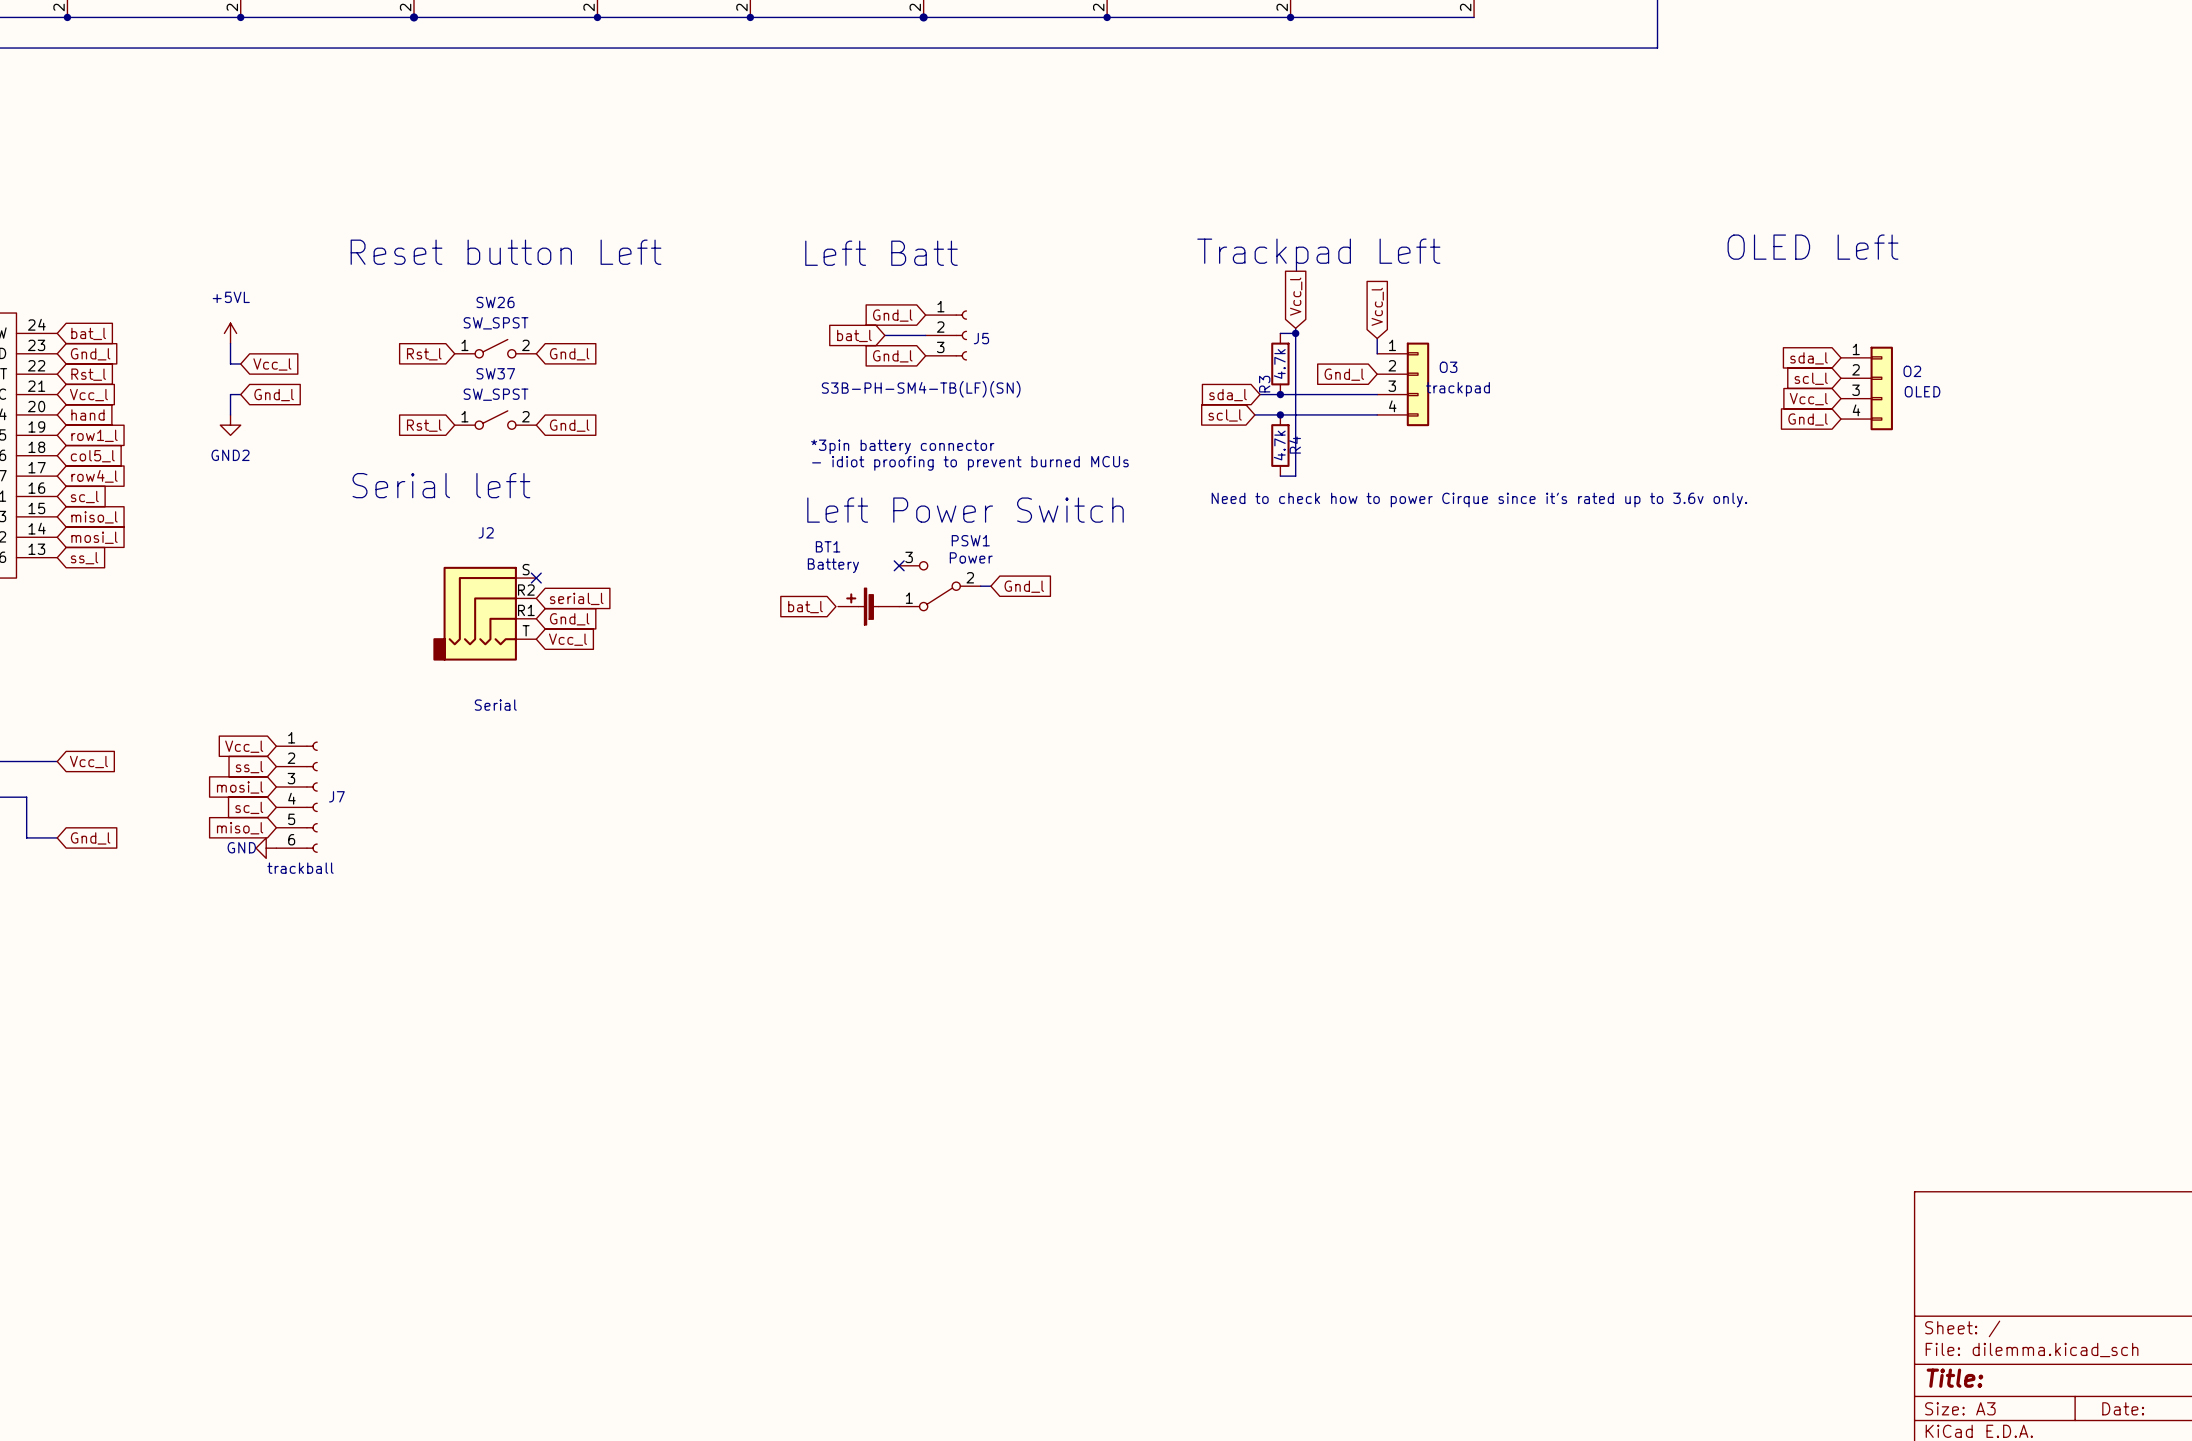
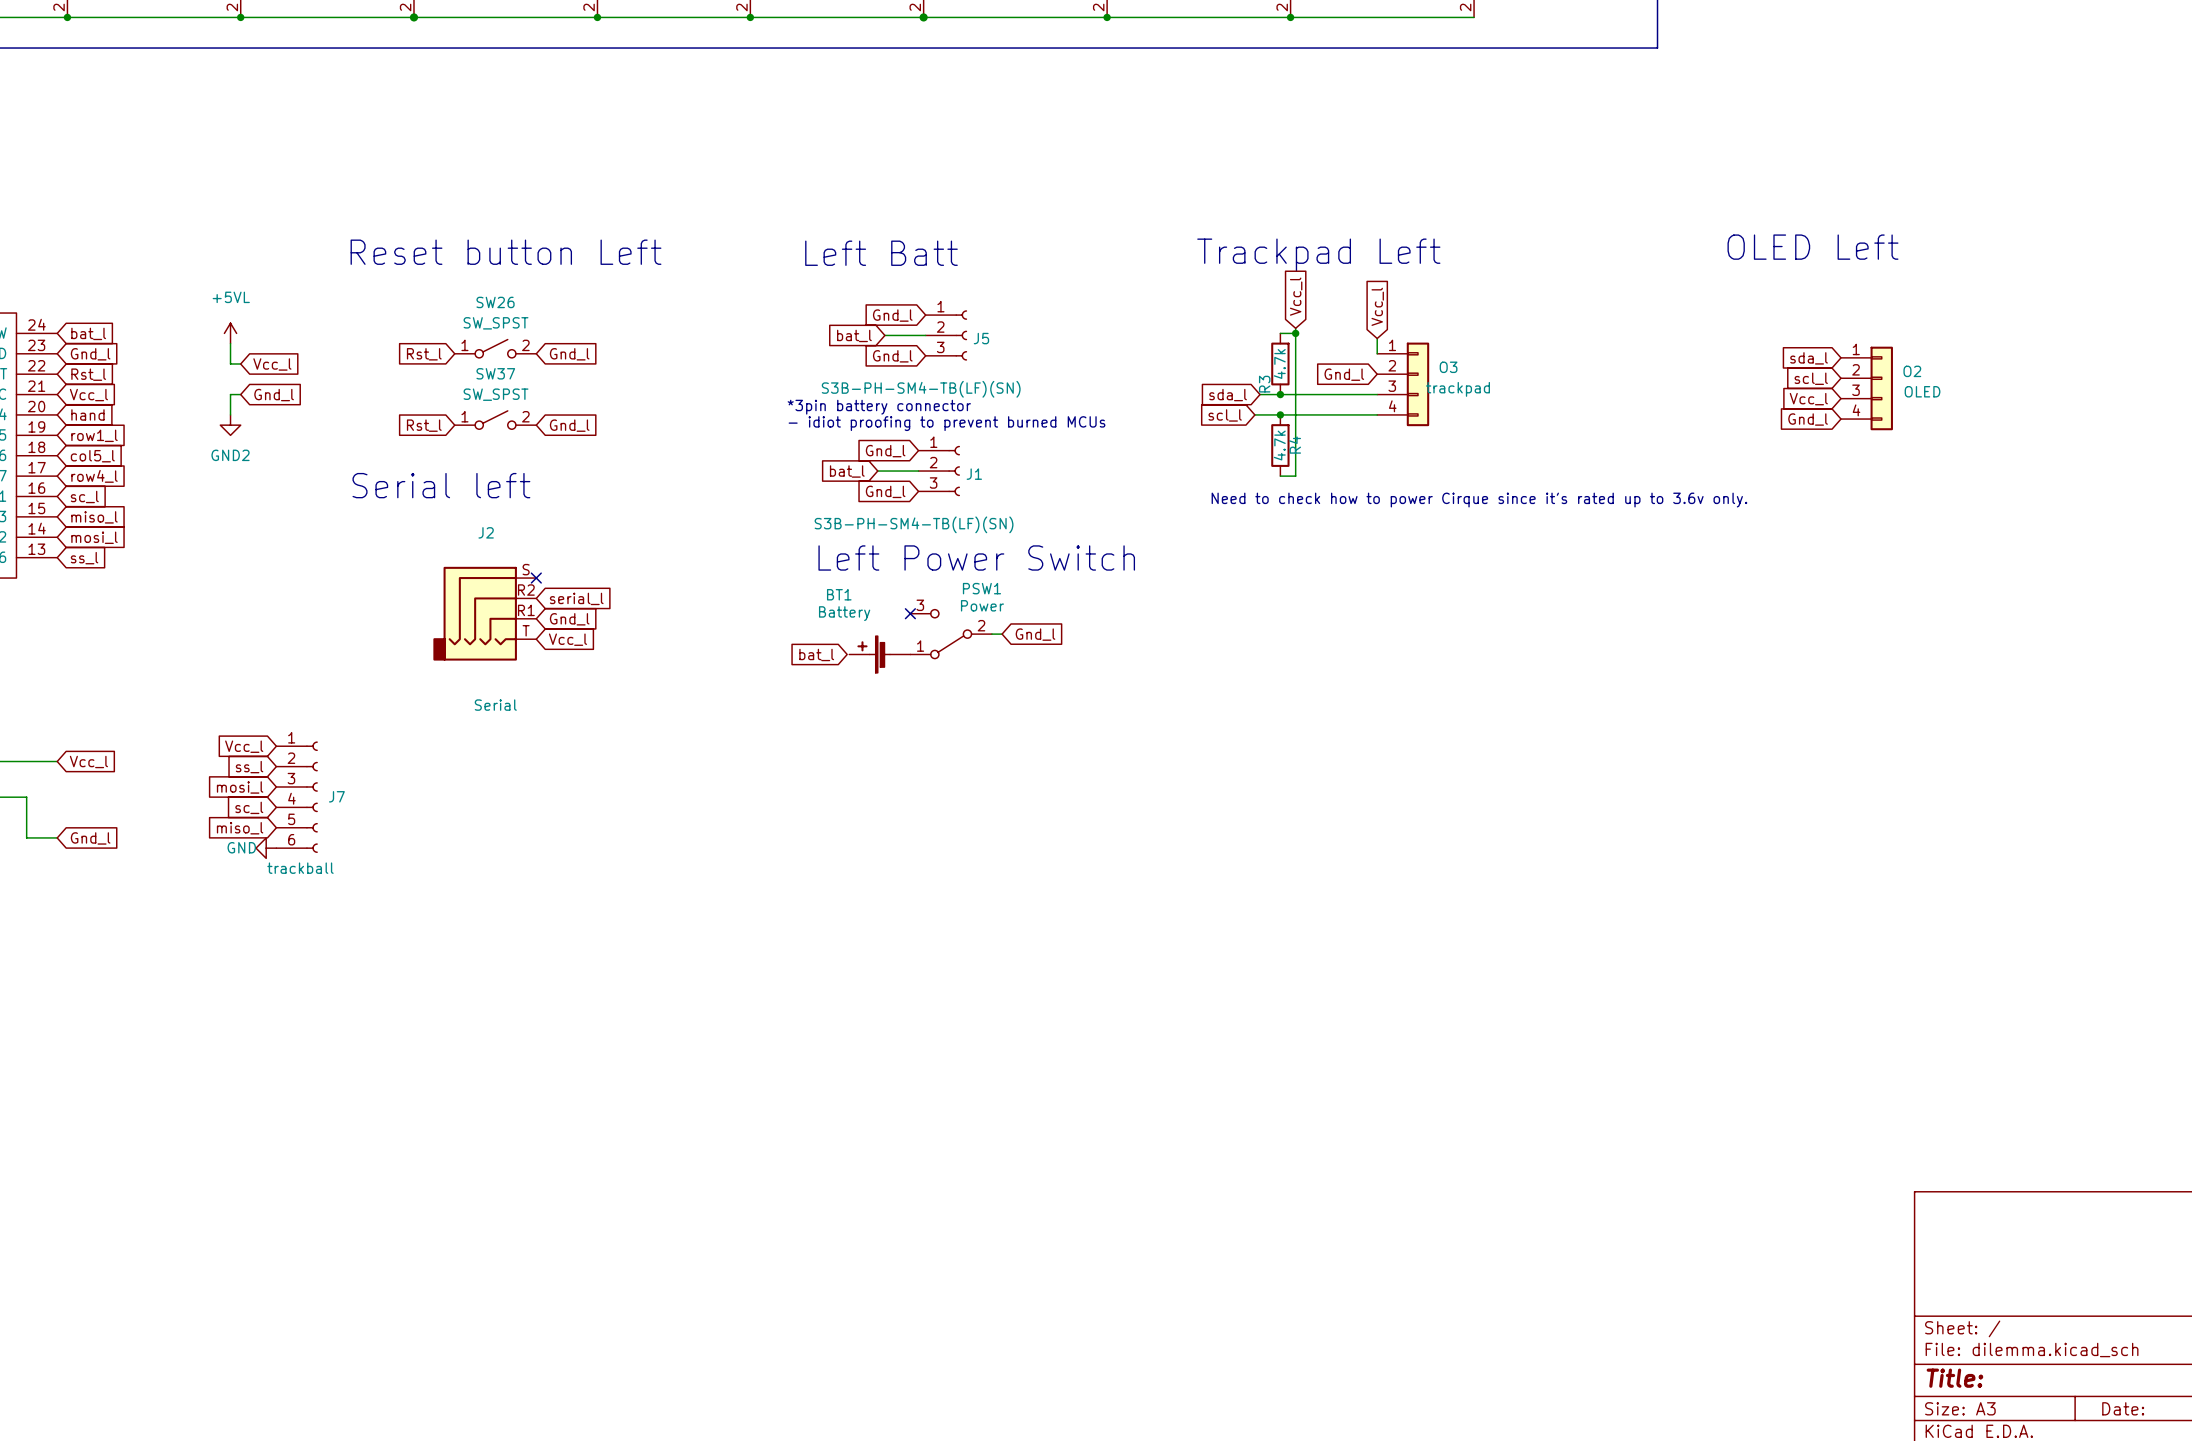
text position: *3pin battery connector (902, 446) -> *3pin battery connector (879, 407)
global label: none -> Gnd_l (885, 451)
text position: - idiot proofing to prevent burned MCUs (970, 463) -> - idiot proofing to prevent burned MCUs (947, 423)
global label: none -> bat_l (847, 471)
wire: none -> (877, 471) (918, 471)
J1: none -> S3B-PH-SM4-TB(LF)(SN) (939, 471)
global label: none -> Gnd_l (885, 491)
text position: Left Power Switch (965, 510) -> Left Power Switch (976, 557)
no-connect mark: (899, 565) -> none
PSW1 position: (939, 586) -> (951, 634)
wire: (980, 586) (990, 586) -> (991, 634) (1002, 634)
global label position: Gnd_l (1024, 586) -> Gnd_l (1035, 634)
BT1 position: (868, 606) -> (879, 654)
global label position: bat_l (805, 607) -> bat_l (816, 654)
no-connect mark: none -> (910, 613)

